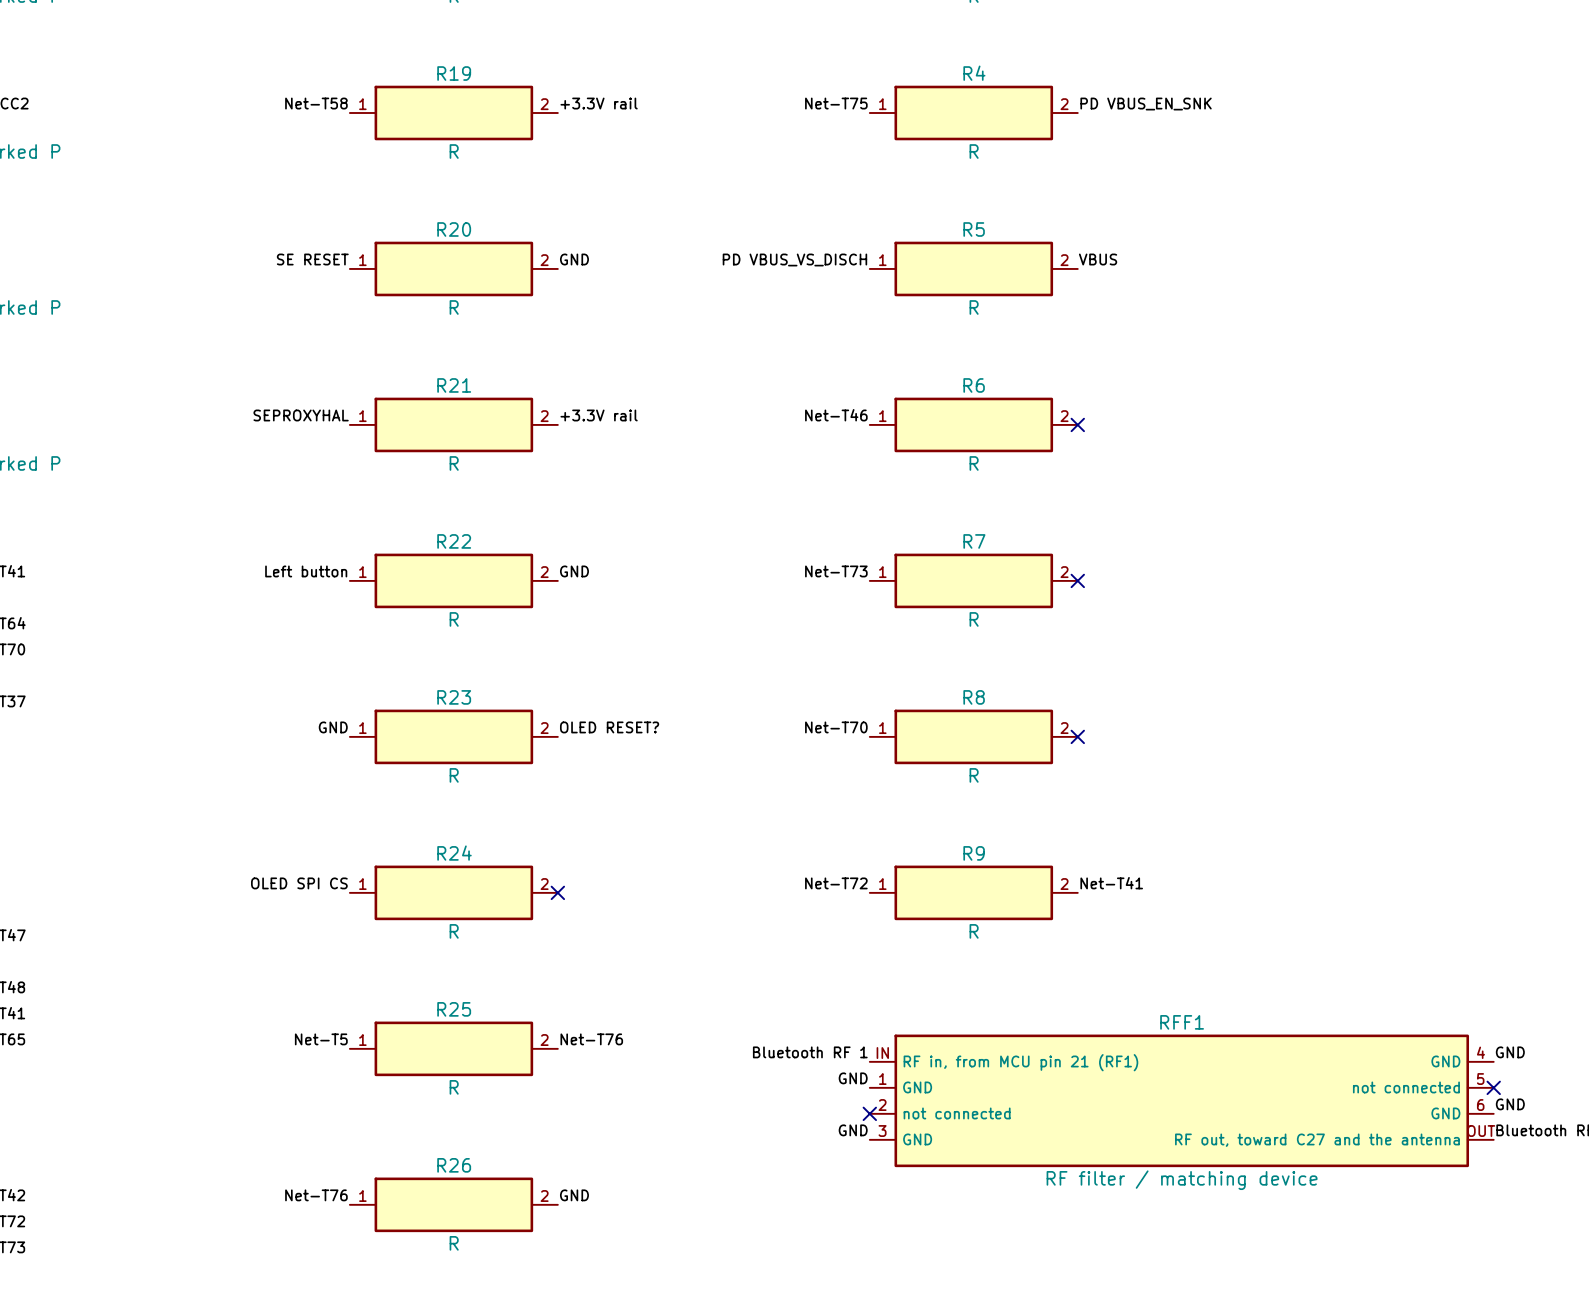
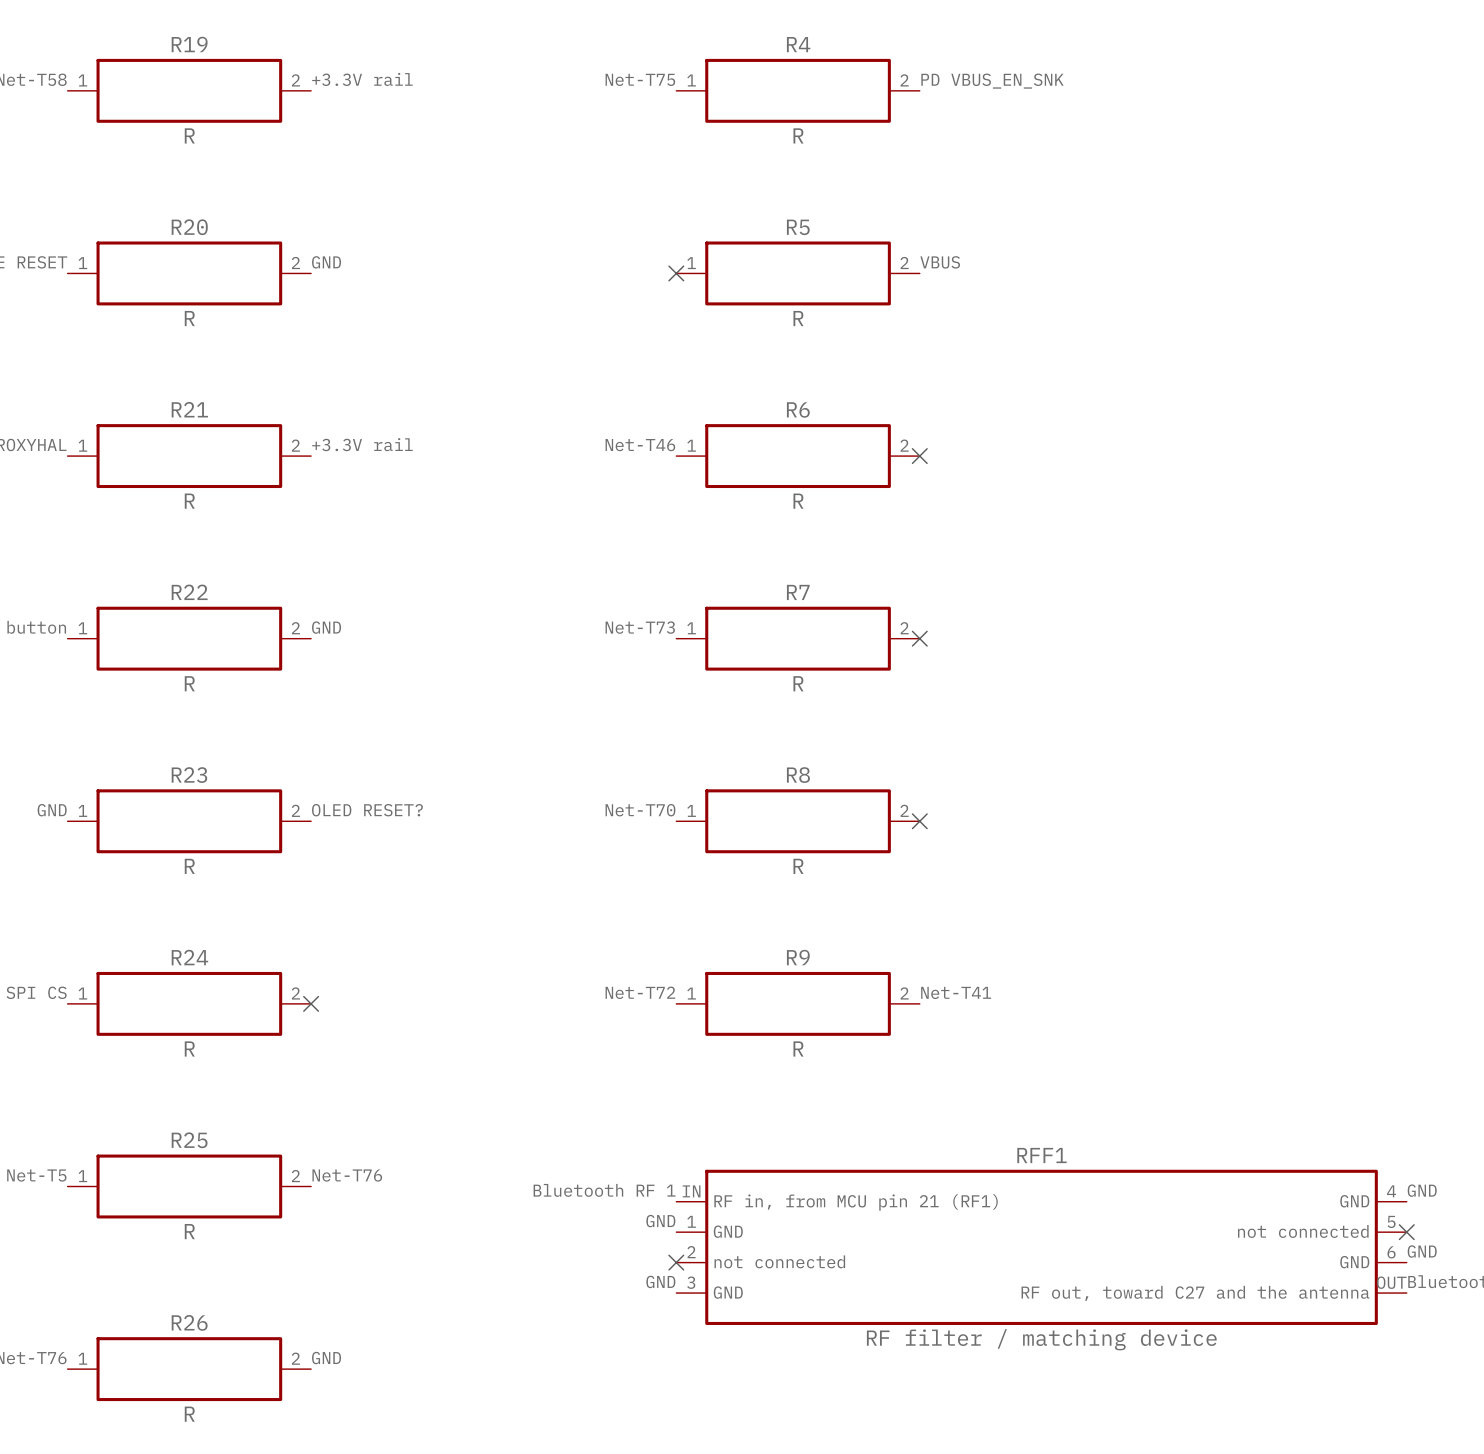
label: PD VBUS_VS_DISCH (794, 259) -> none
no-connect mark: none -> (676, 273)

